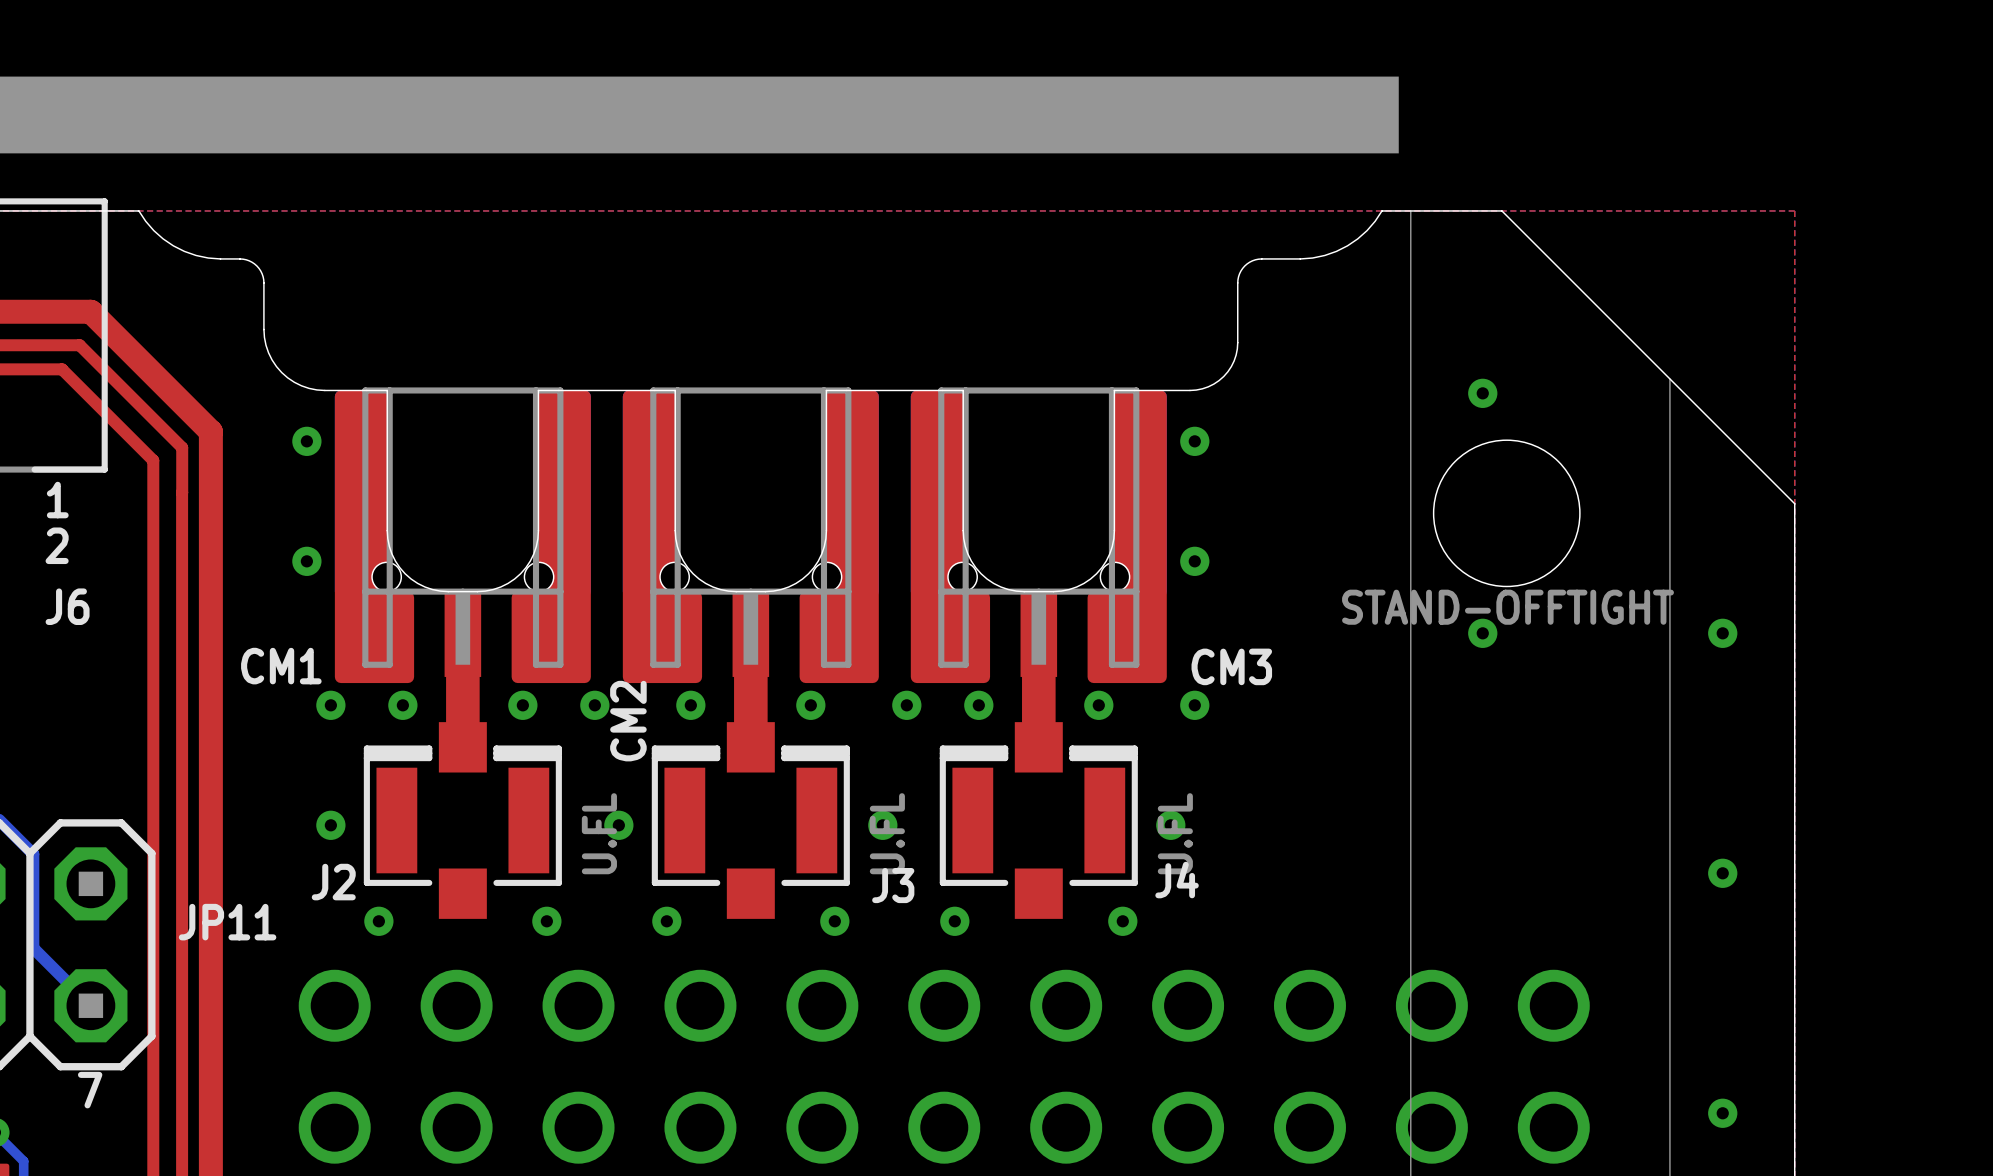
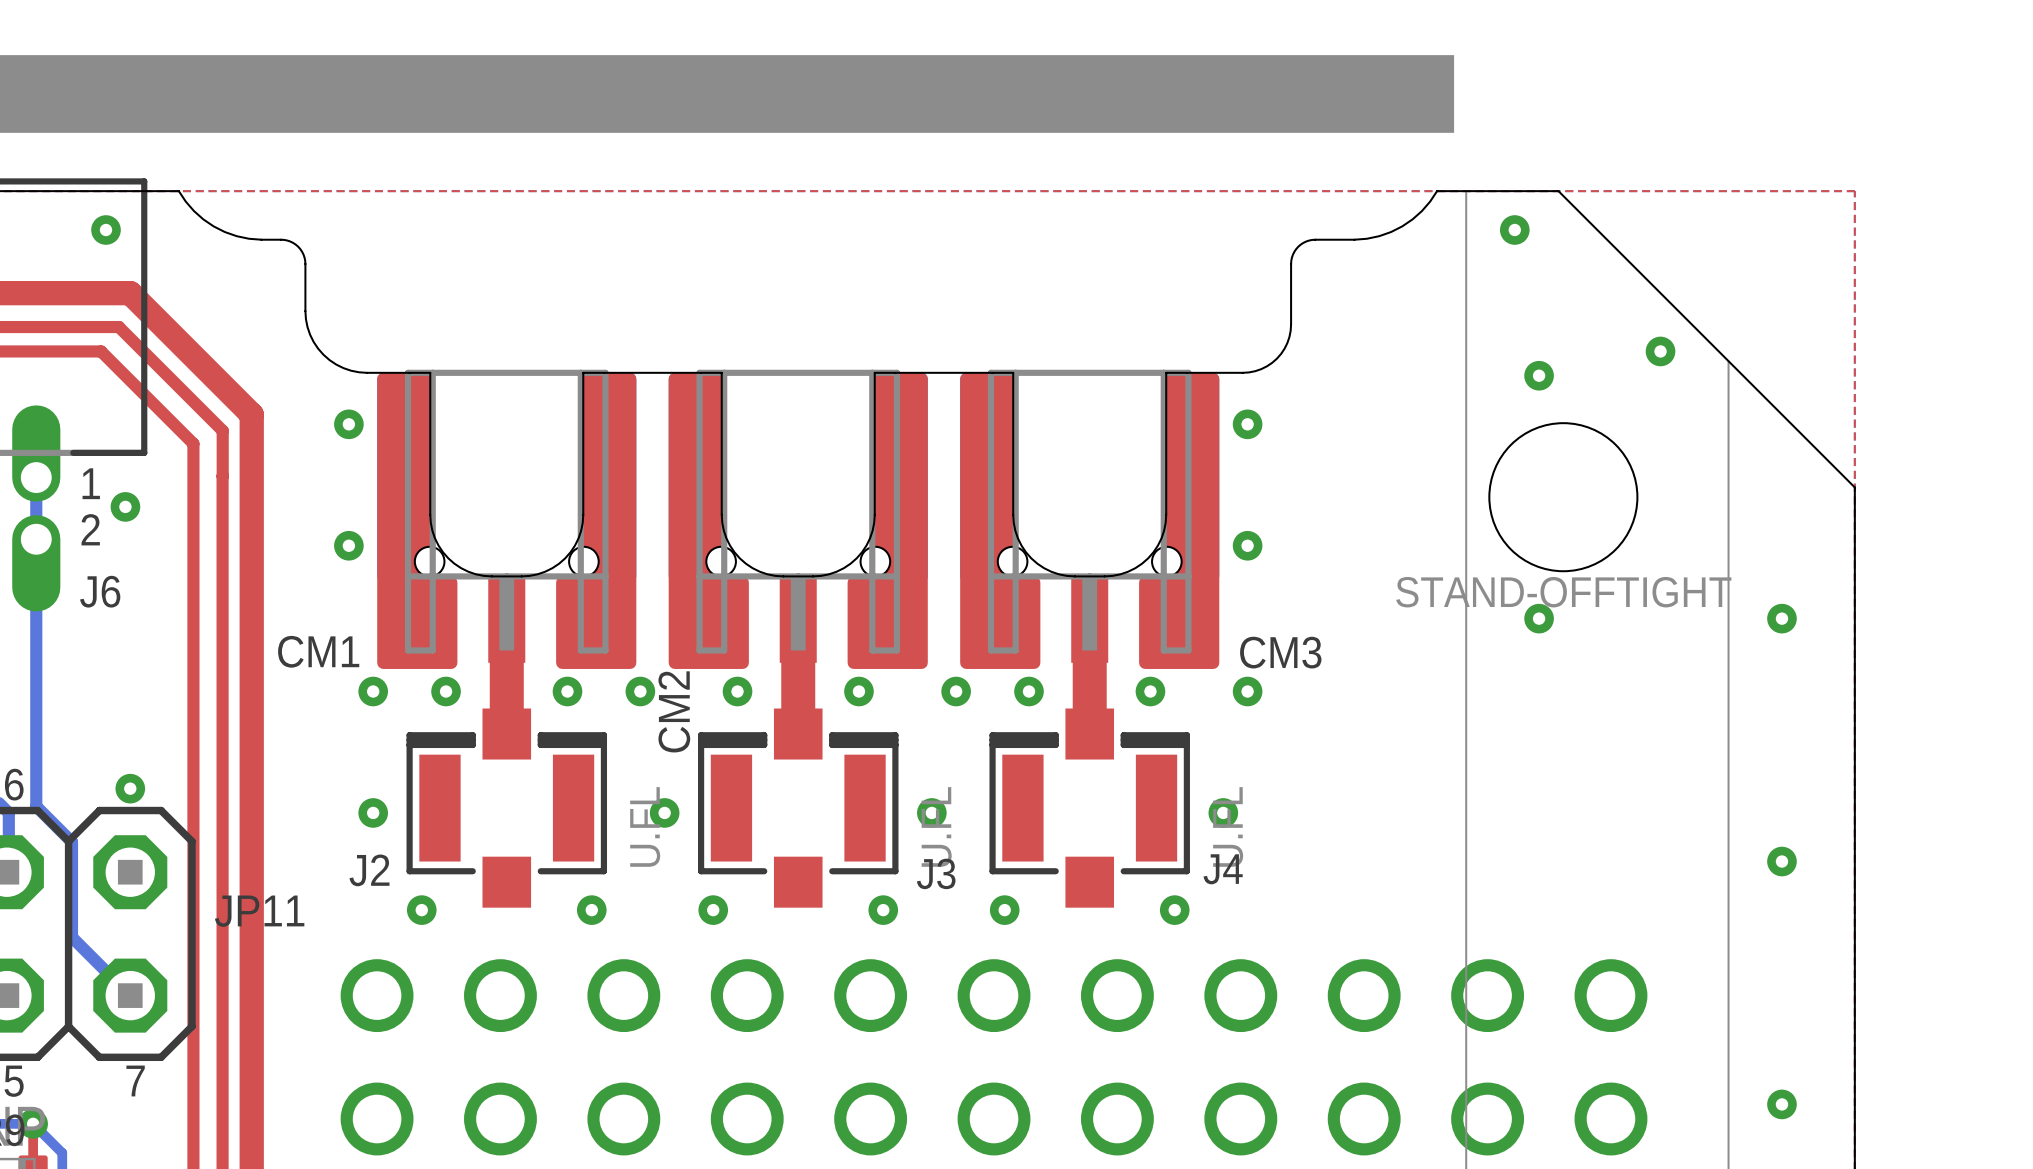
via: none -> (105, 230)
via: none -> (1514, 230)
via: none -> (1660, 351)
via: none -> (125, 506)
via: none -> (130, 788)

